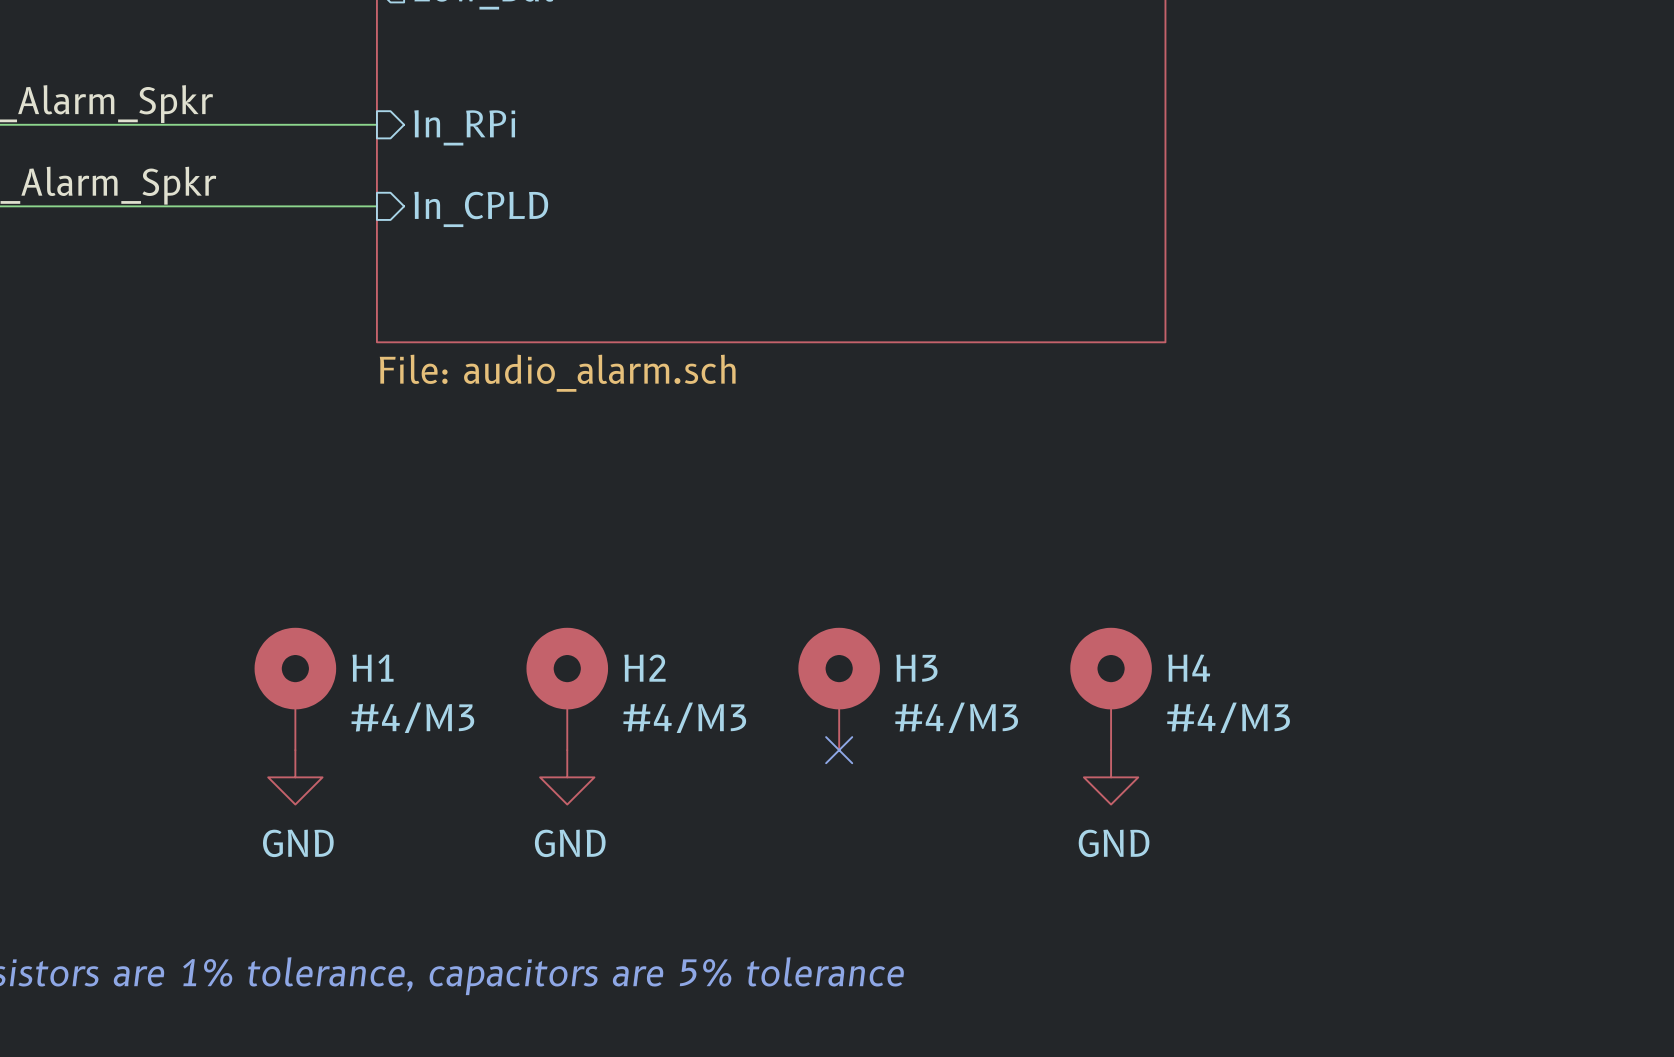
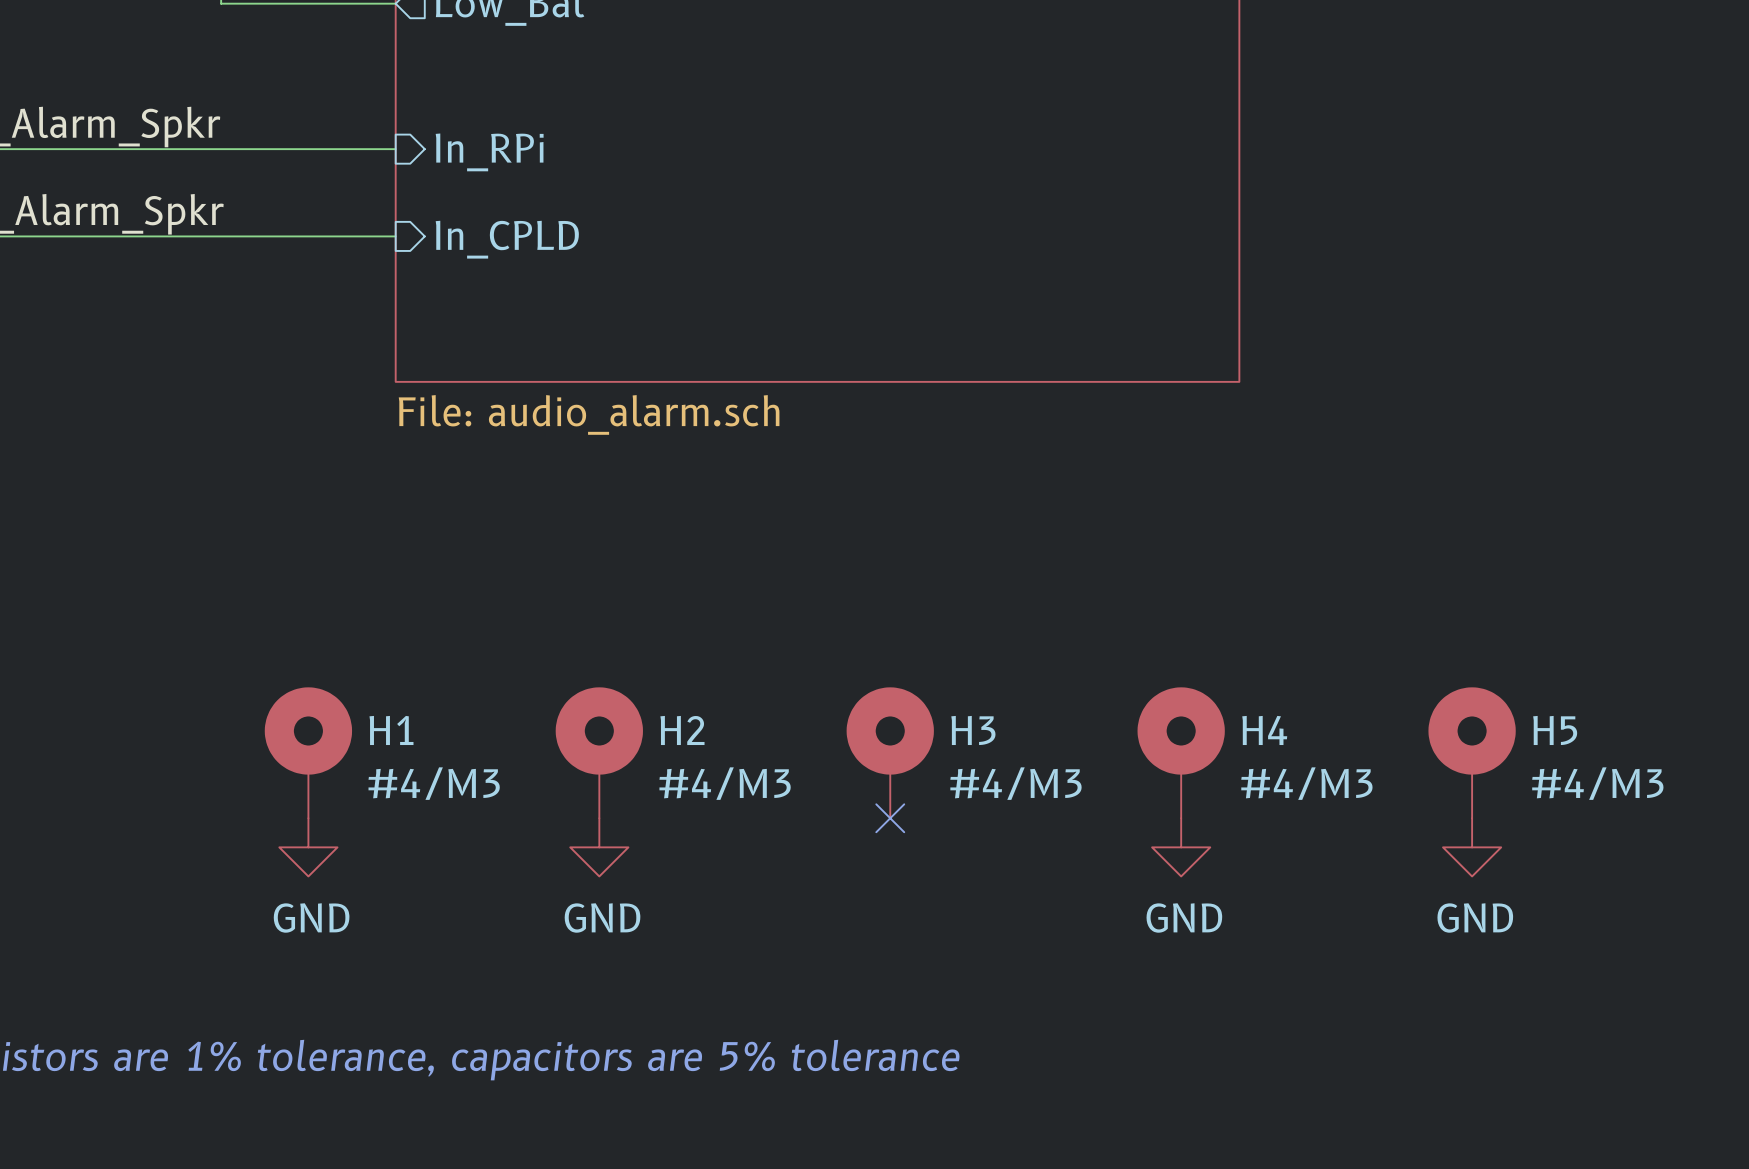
H5: none -> #4/M3 (1472, 752)
power symbol: none -> GND (1472, 847)

